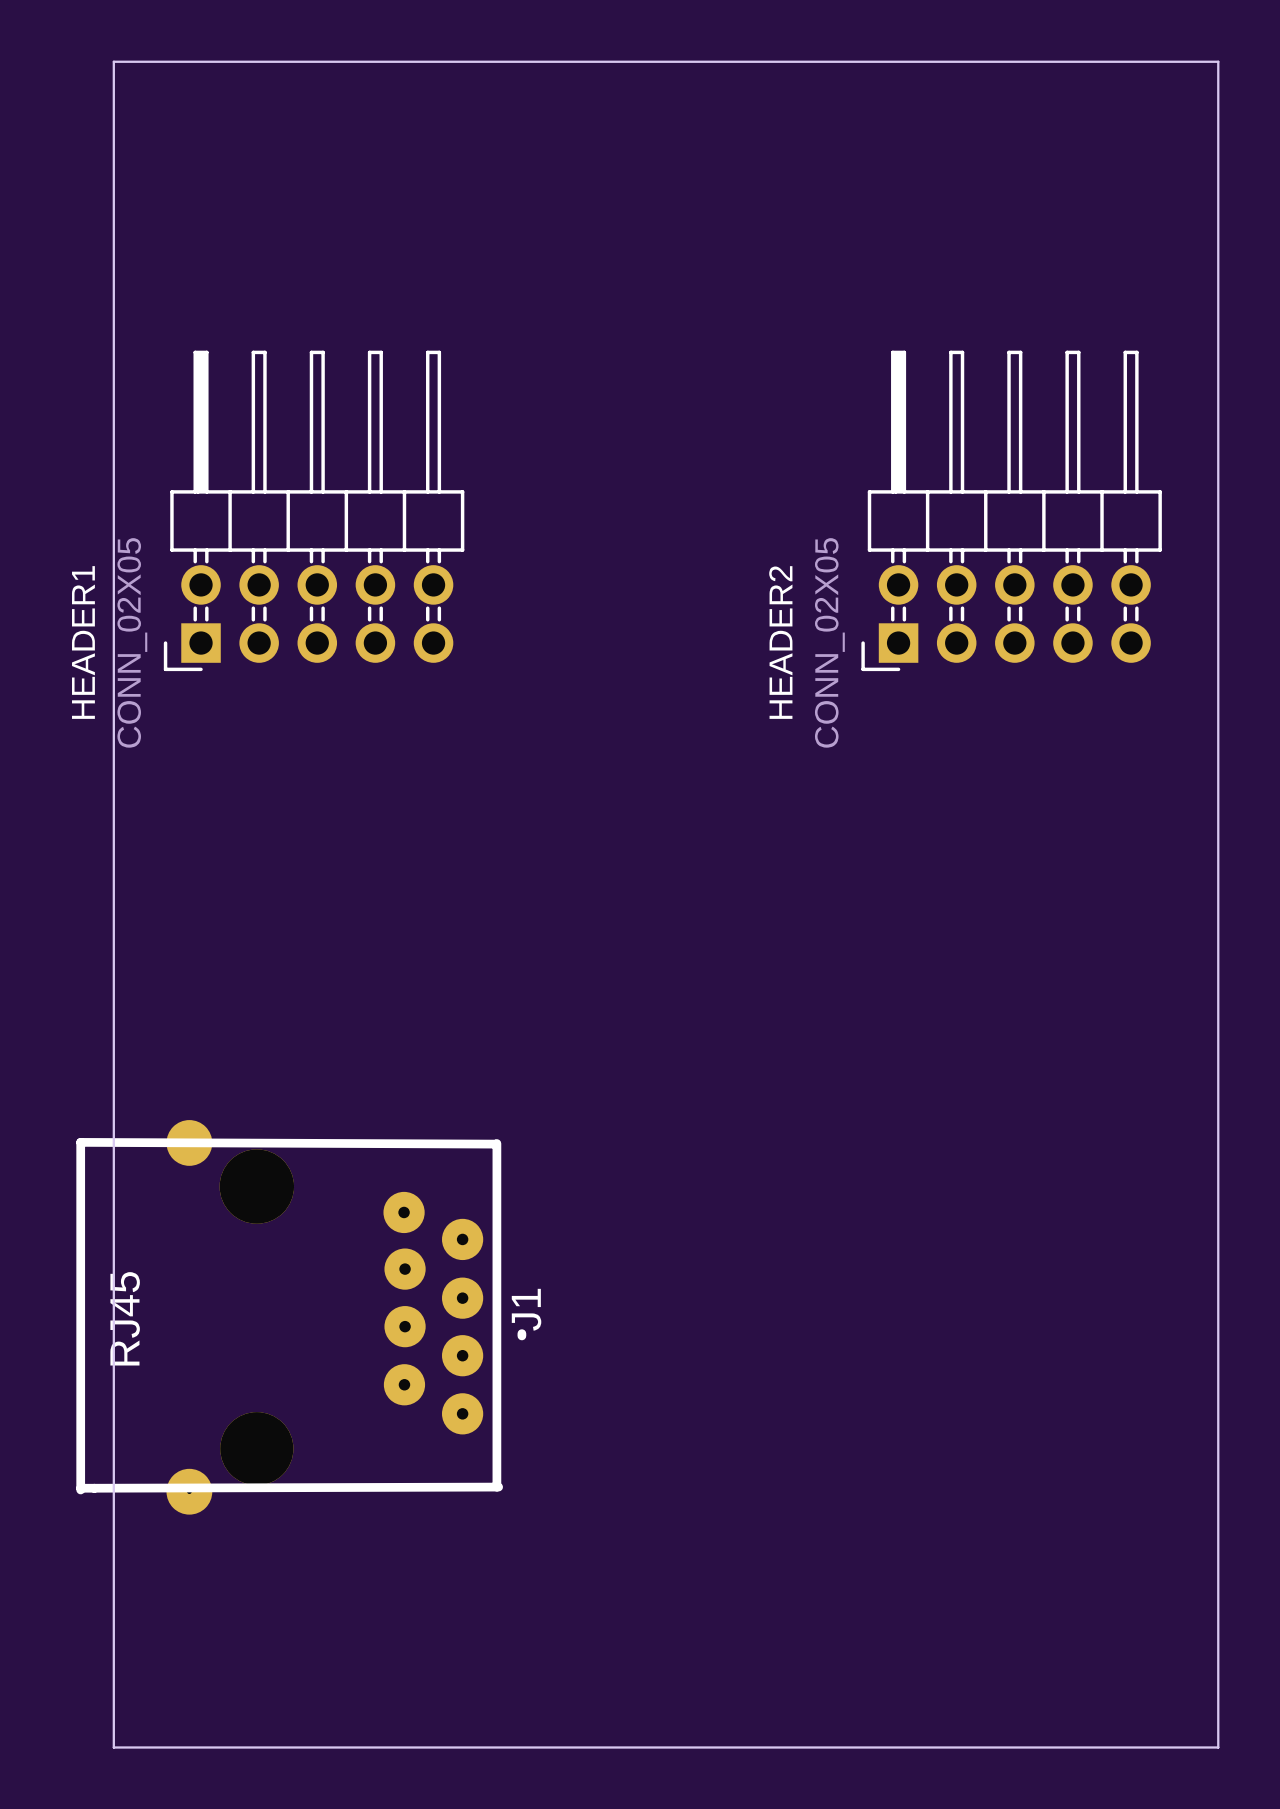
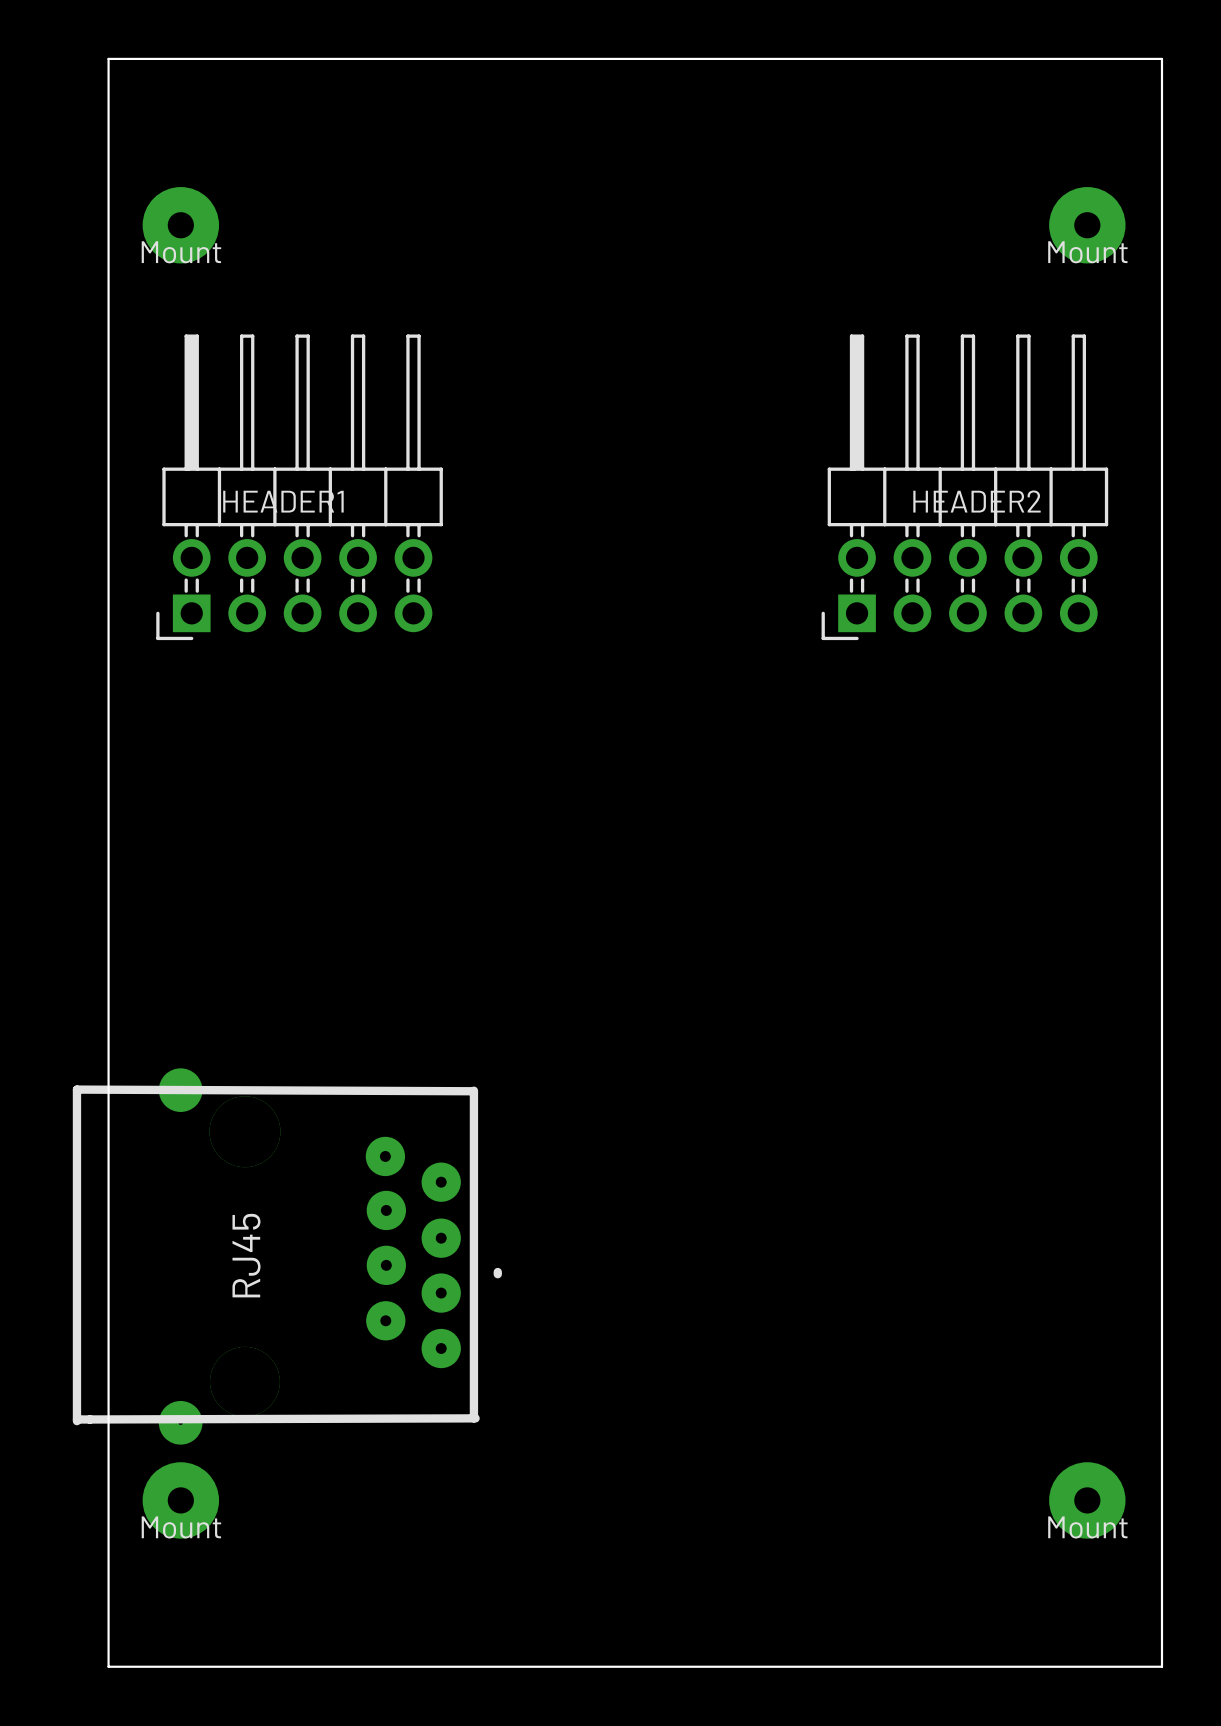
Mount: none -> (180, 225)
Mount: none -> (1087, 225)
HEADER1 name rotation: 0° (83, 642) -> 90° clockwise (283, 501)
HEADER1 name position: HEADER1 (83, 642) -> HEADER1 (283, 501)
HEADER1 value: CONN_02X05 (132, 642) -> none
HEADER2 name rotation: 0° (780, 642) -> 90° clockwise (977, 501)
HEADER2 name position: HEADER2 (780, 642) -> HEADER2 (977, 501)
HEADER2 value: CONN_02X05 (829, 642) -> none
J1 name: J1 (526, 1309) -> none
J1 value position: RJ45 (125, 1318) -> RJ45 (246, 1255)
Mount: none -> (180, 1500)
Mount: none -> (1087, 1500)

